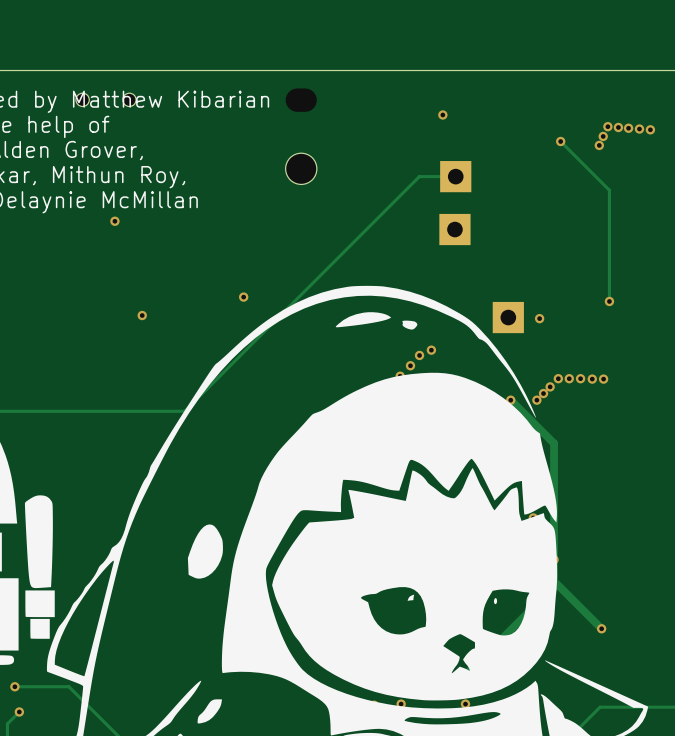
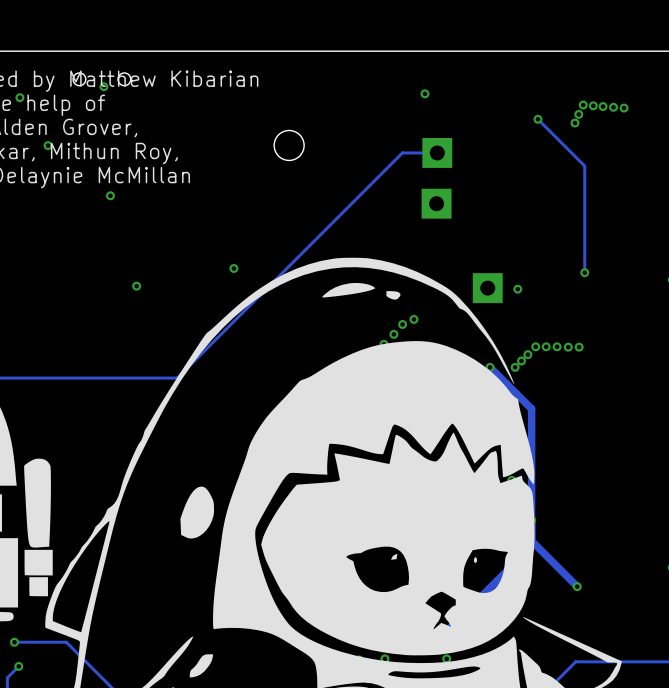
via: none -> (103, 86)
via: none -> (19, 97)
via: none -> (48, 145)

